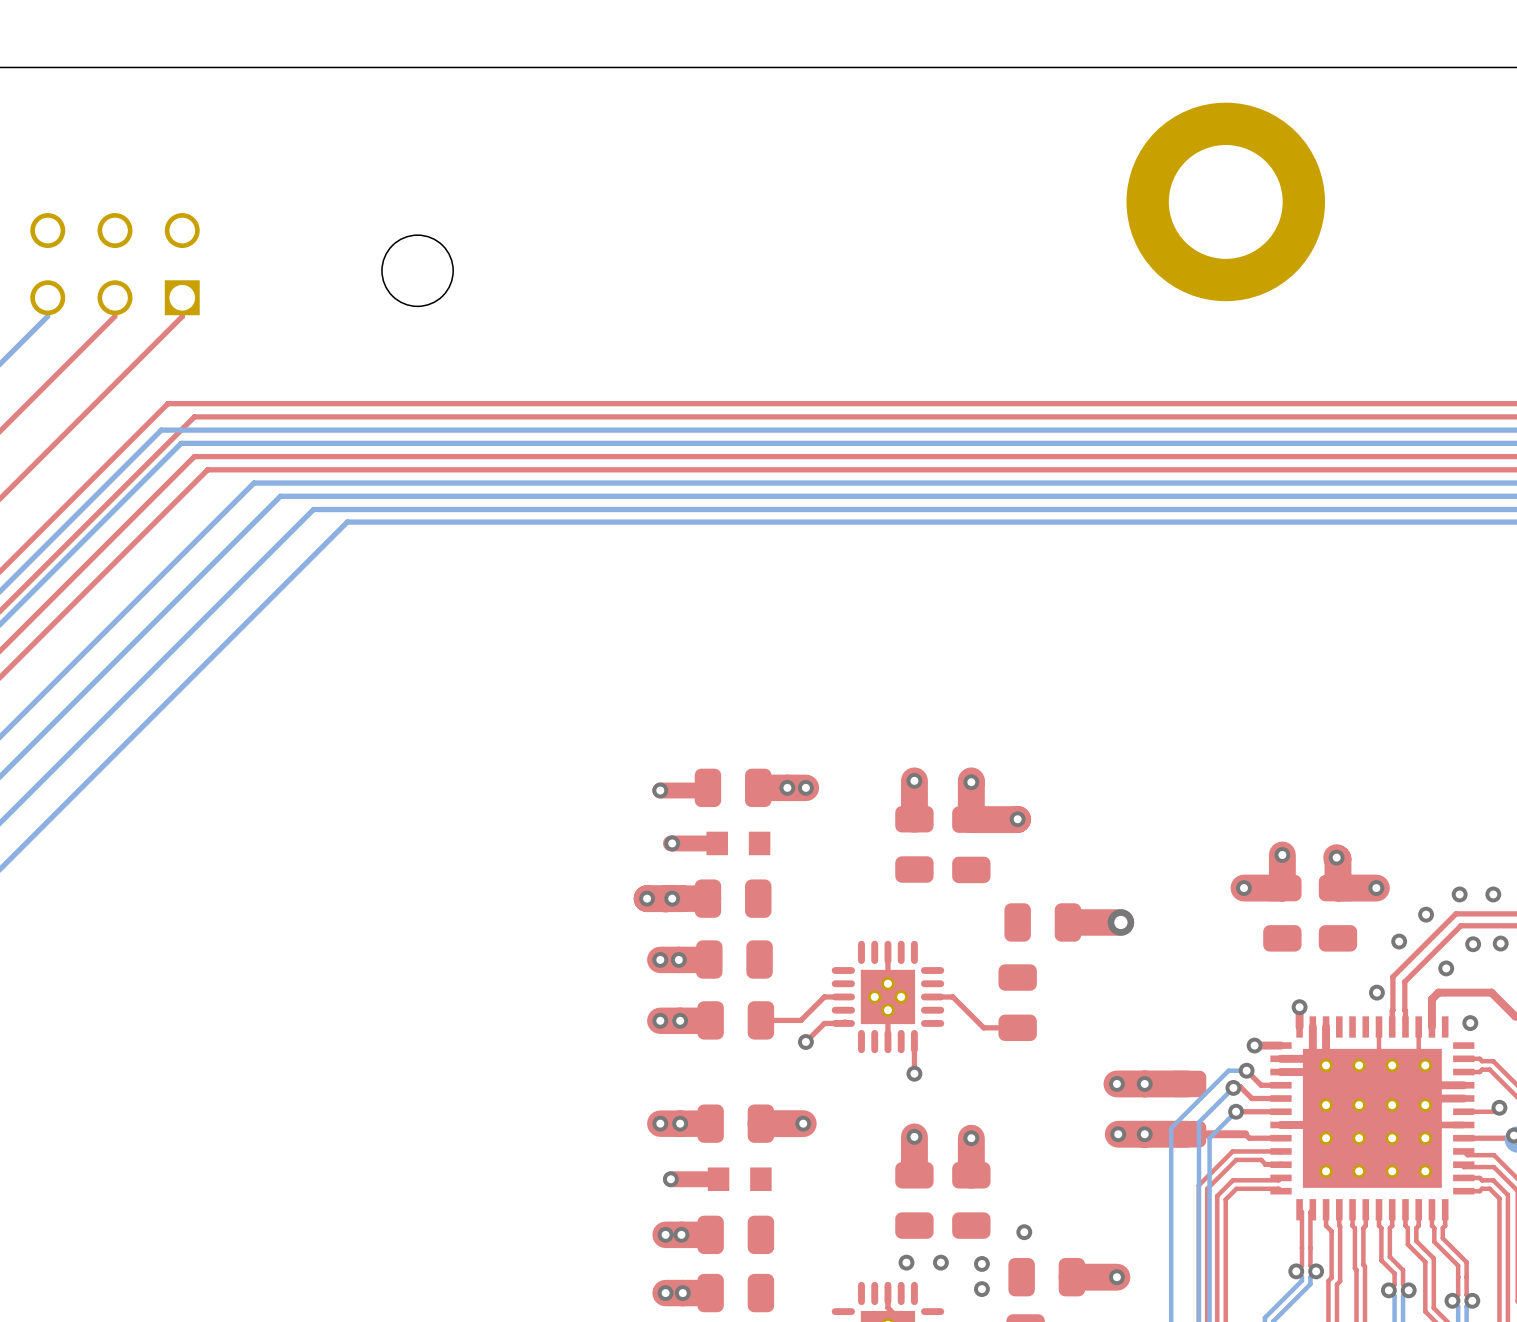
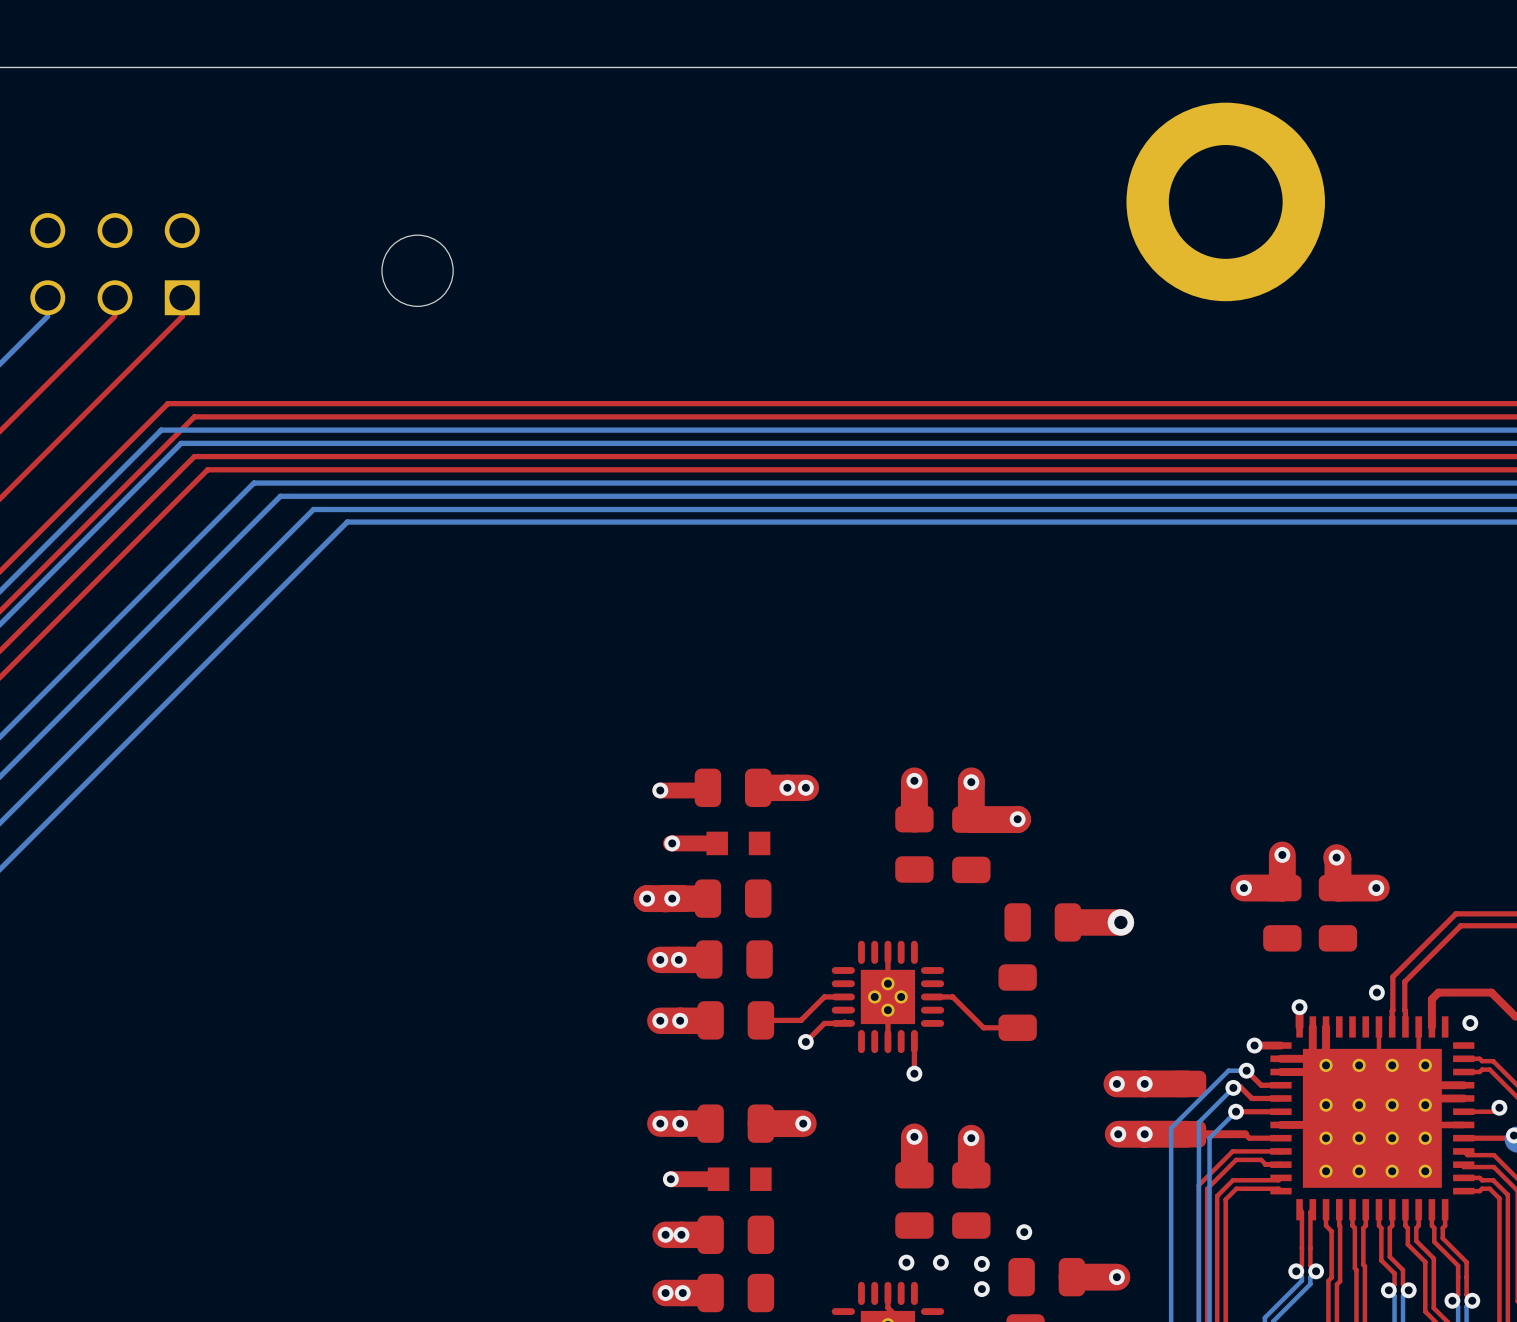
via: (1459, 894) -> none
via: (1493, 894) -> none
via: (1426, 914) -> none
via: (1399, 941) -> none
via: (1500, 943) -> none
via: (1473, 944) -> none
via: (1446, 968) -> none

